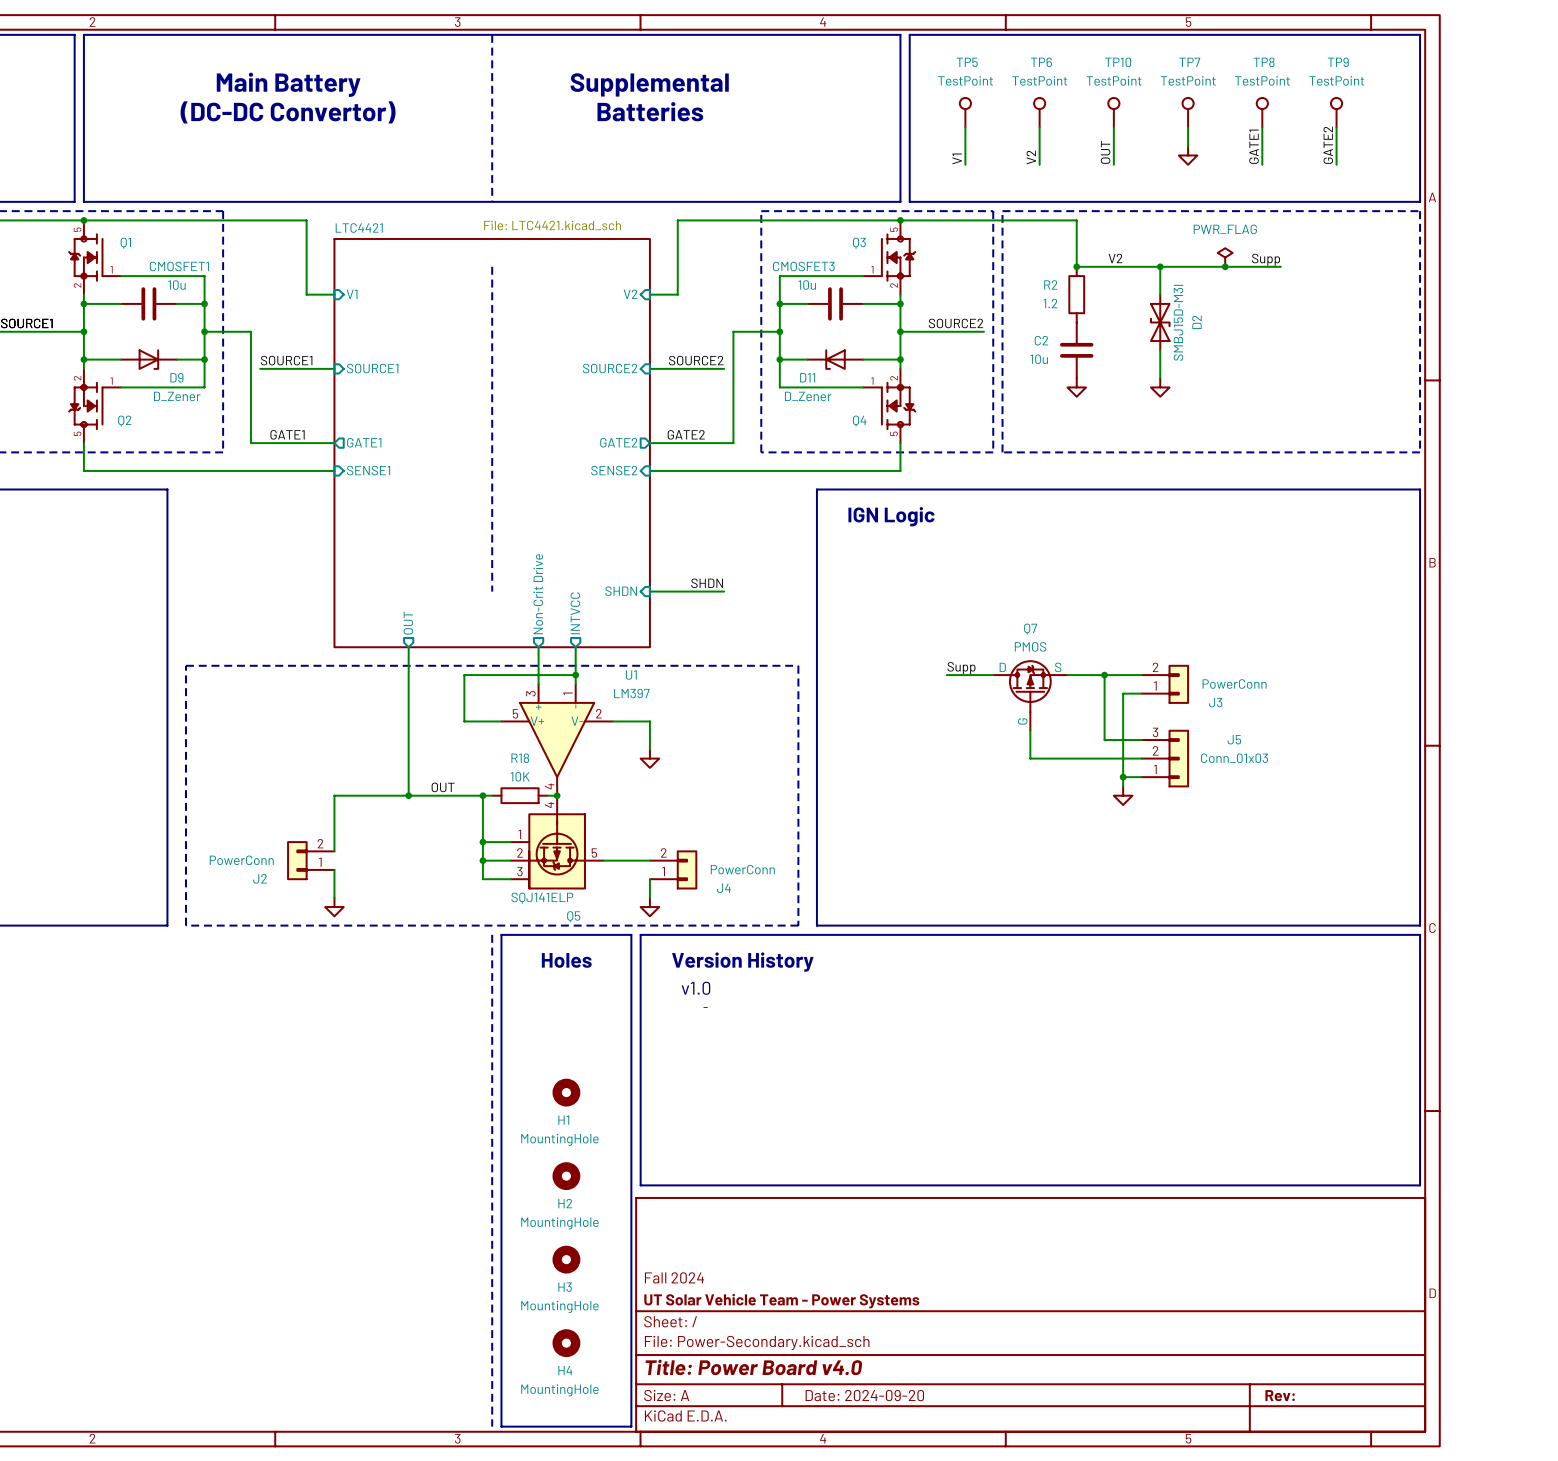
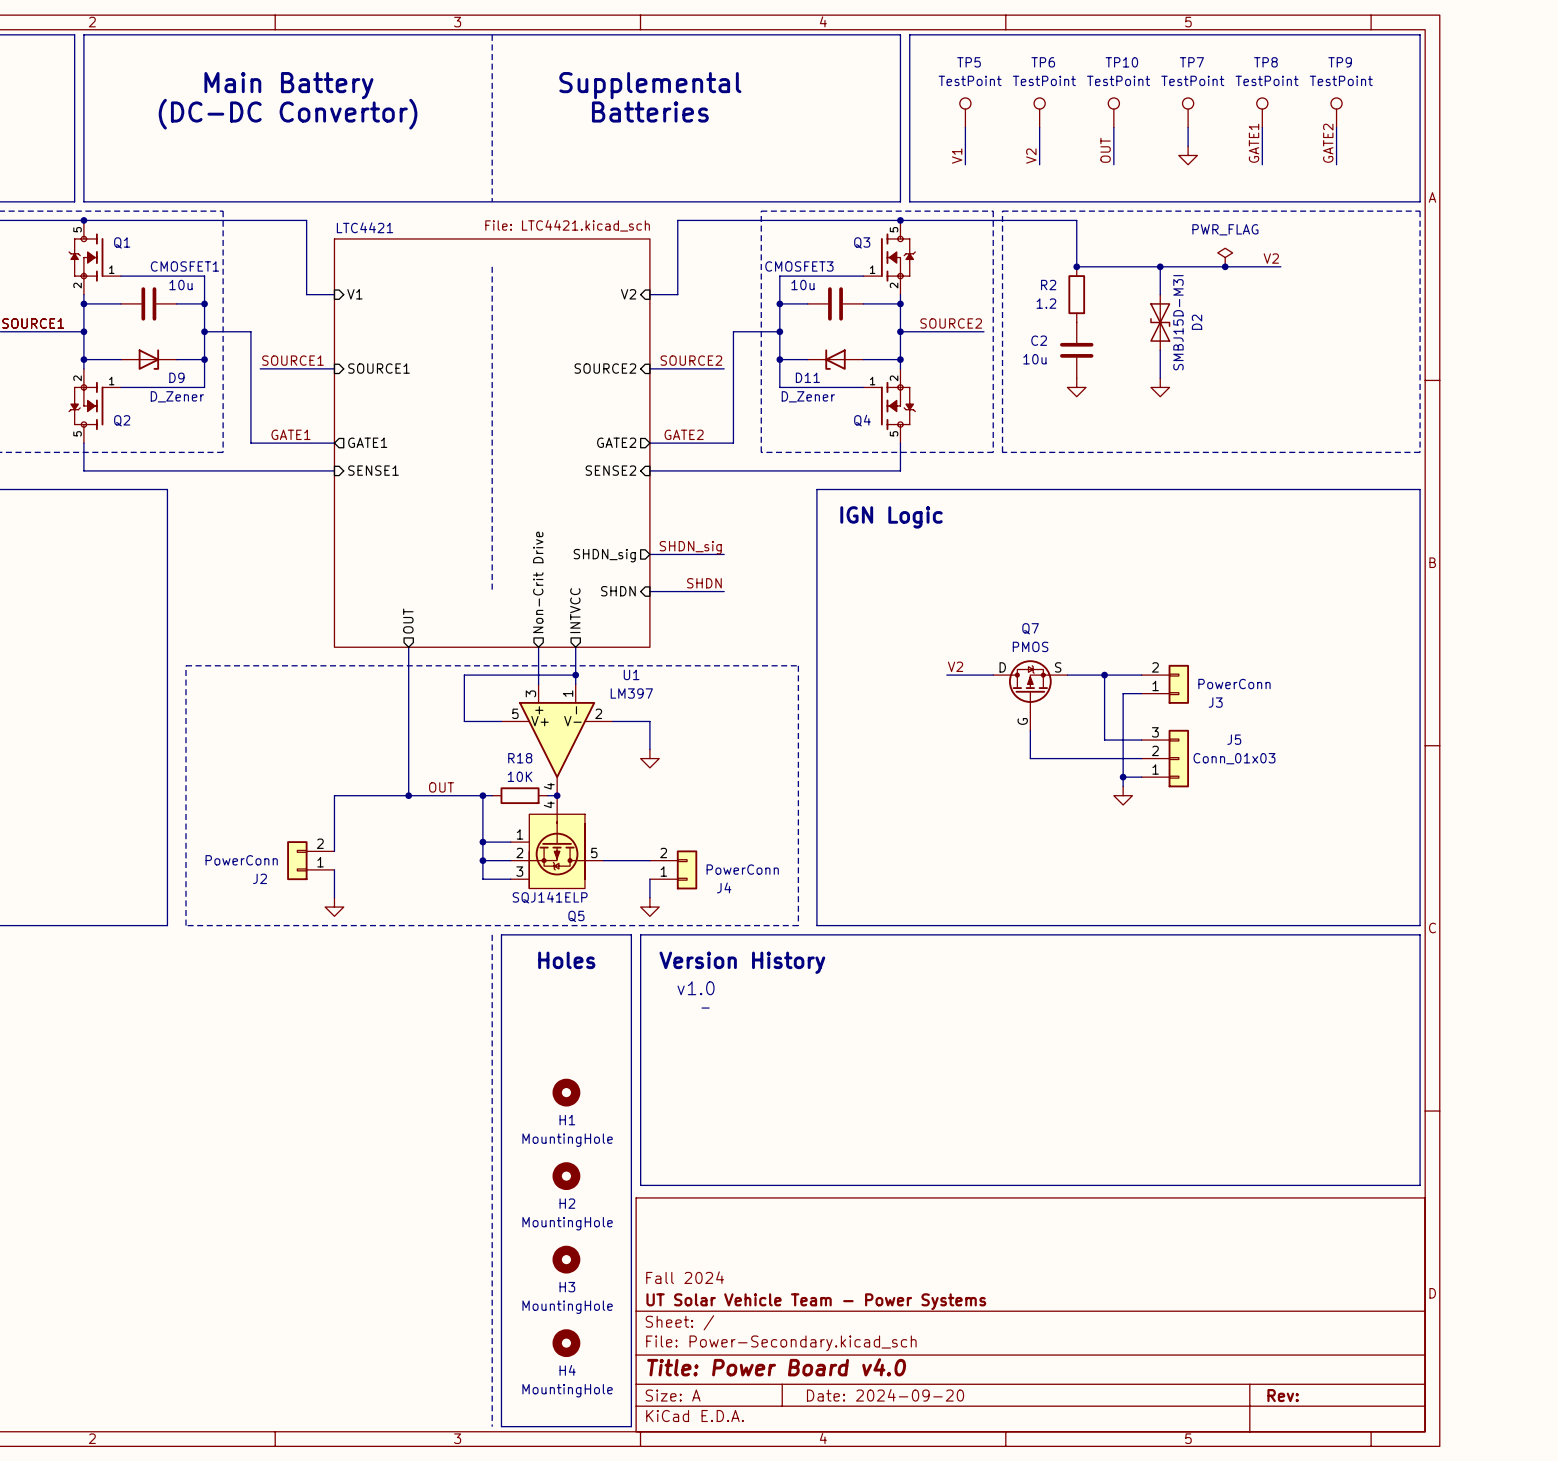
label: V2 (1115, 258) -> none
label: Supp (1266, 259) -> V2 (1271, 258)
label: none -> SHDN_sig (690, 547)
wire: none -> (649, 554) (724, 554)
sheet pin: none -> SHDN_sig (604, 555)
label: Supp (961, 668) -> V2 (955, 666)

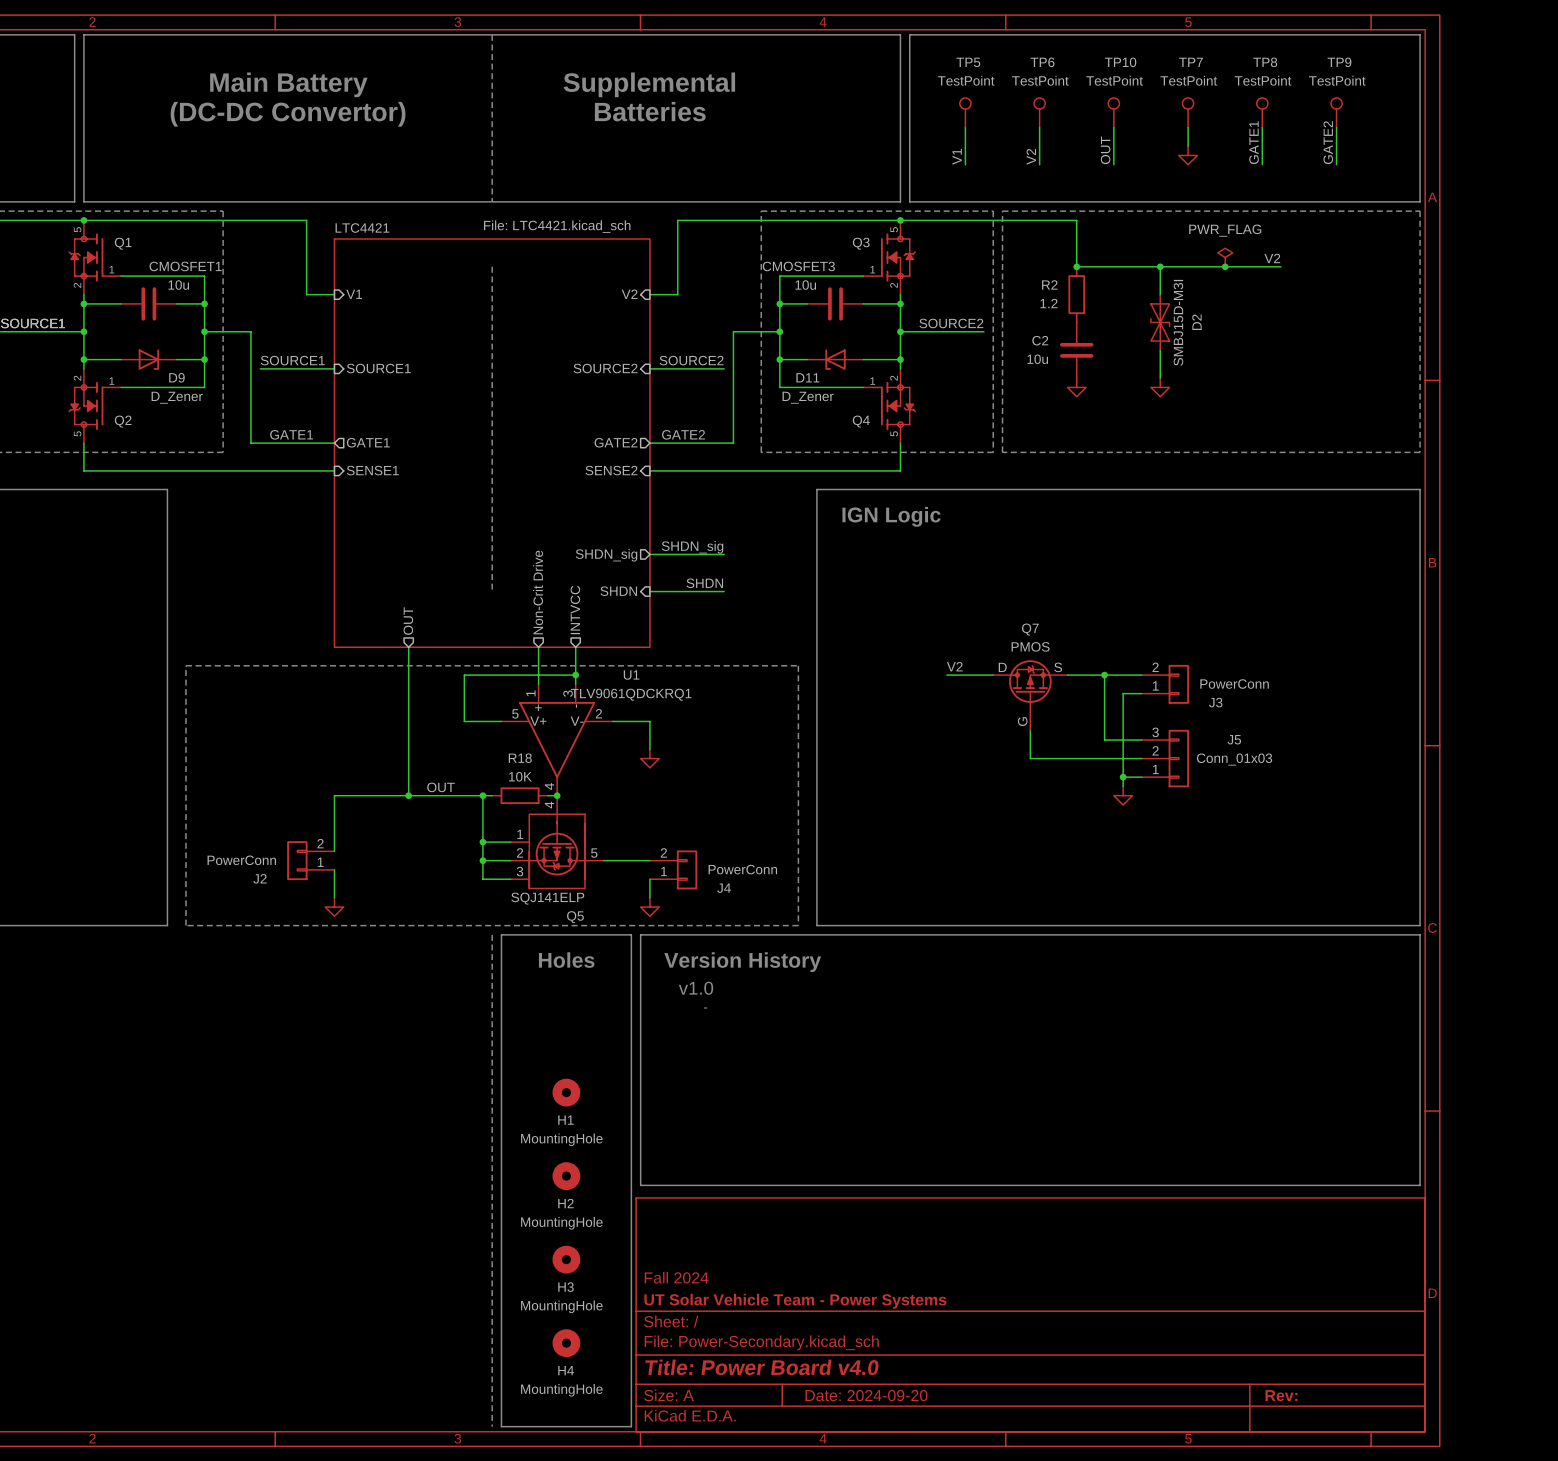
U1 pin number: 3 (530, 693) -> 1 (530, 693)
U1 pin number: 1 (568, 693) -> 3 (568, 693)
U1 value: LM397 (631, 693) -> TLV9061QDCKRQ1 (631, 694)

